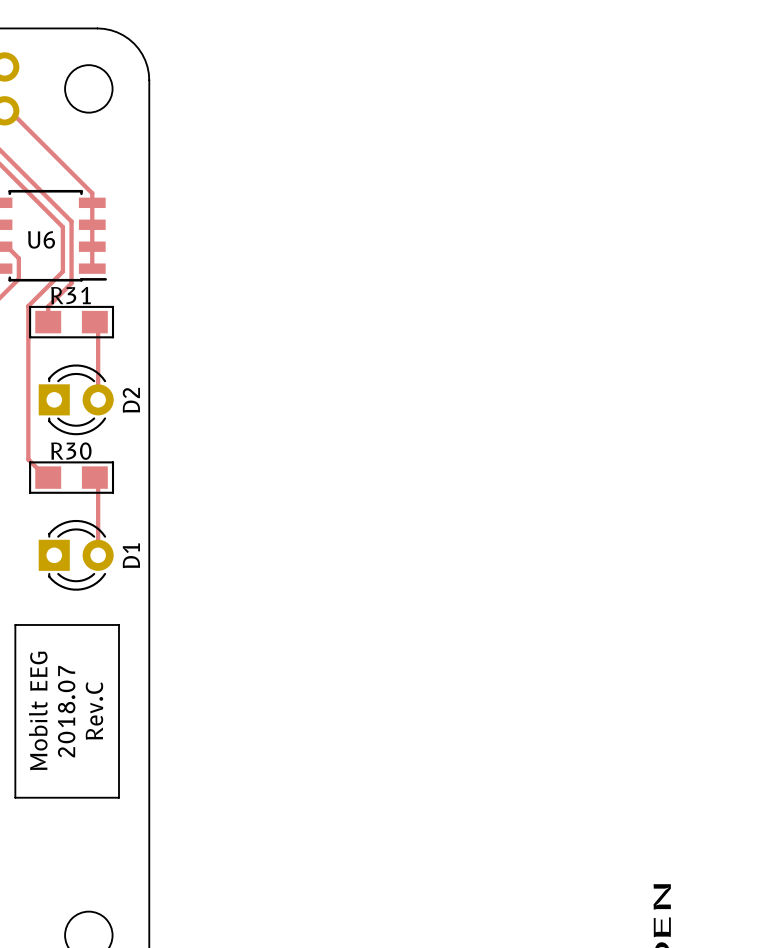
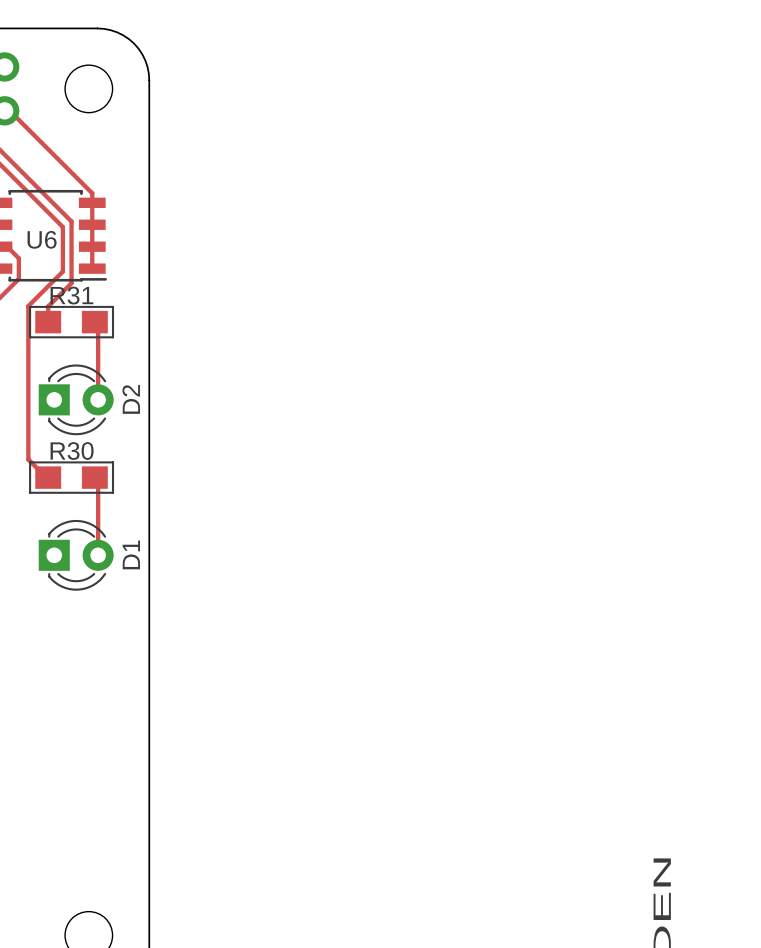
line: (15, 624) (119, 624) (119, 797) (15, 797) (15, 624) -> none
text: Mobilt EEG (38, 710) -> none
text: Rev.C (94, 710) -> none
text: 2018.07 (66, 711) -> none

